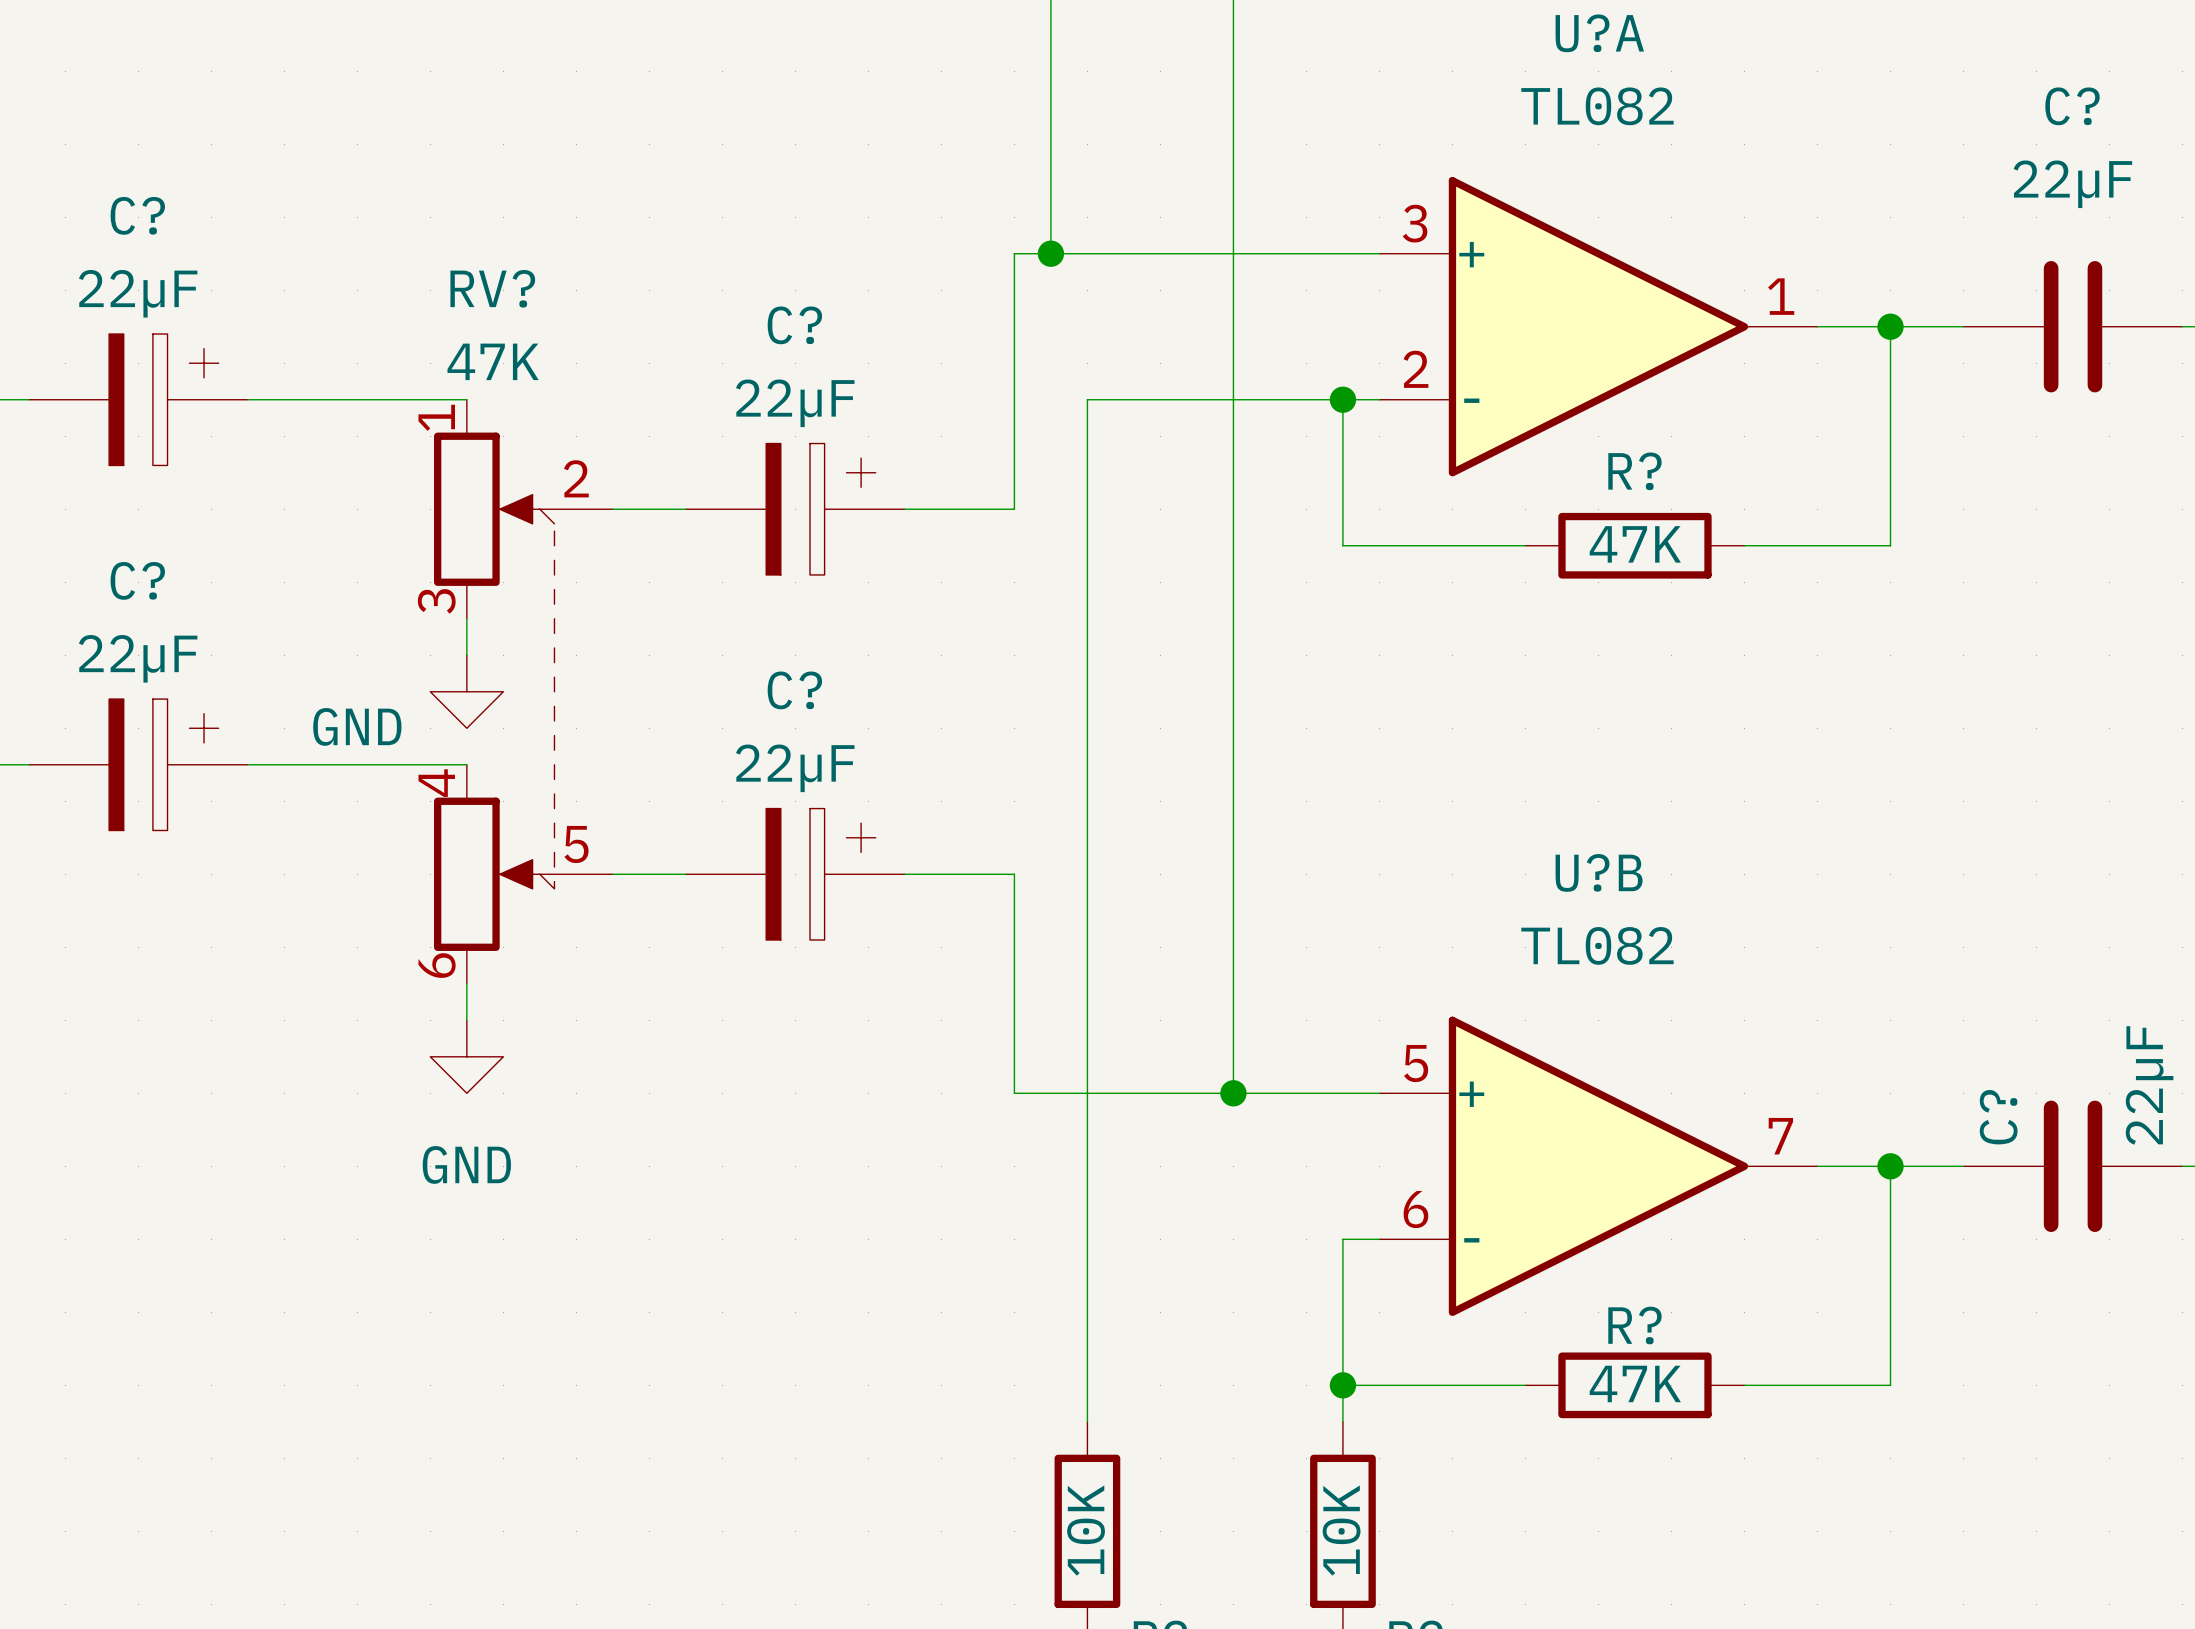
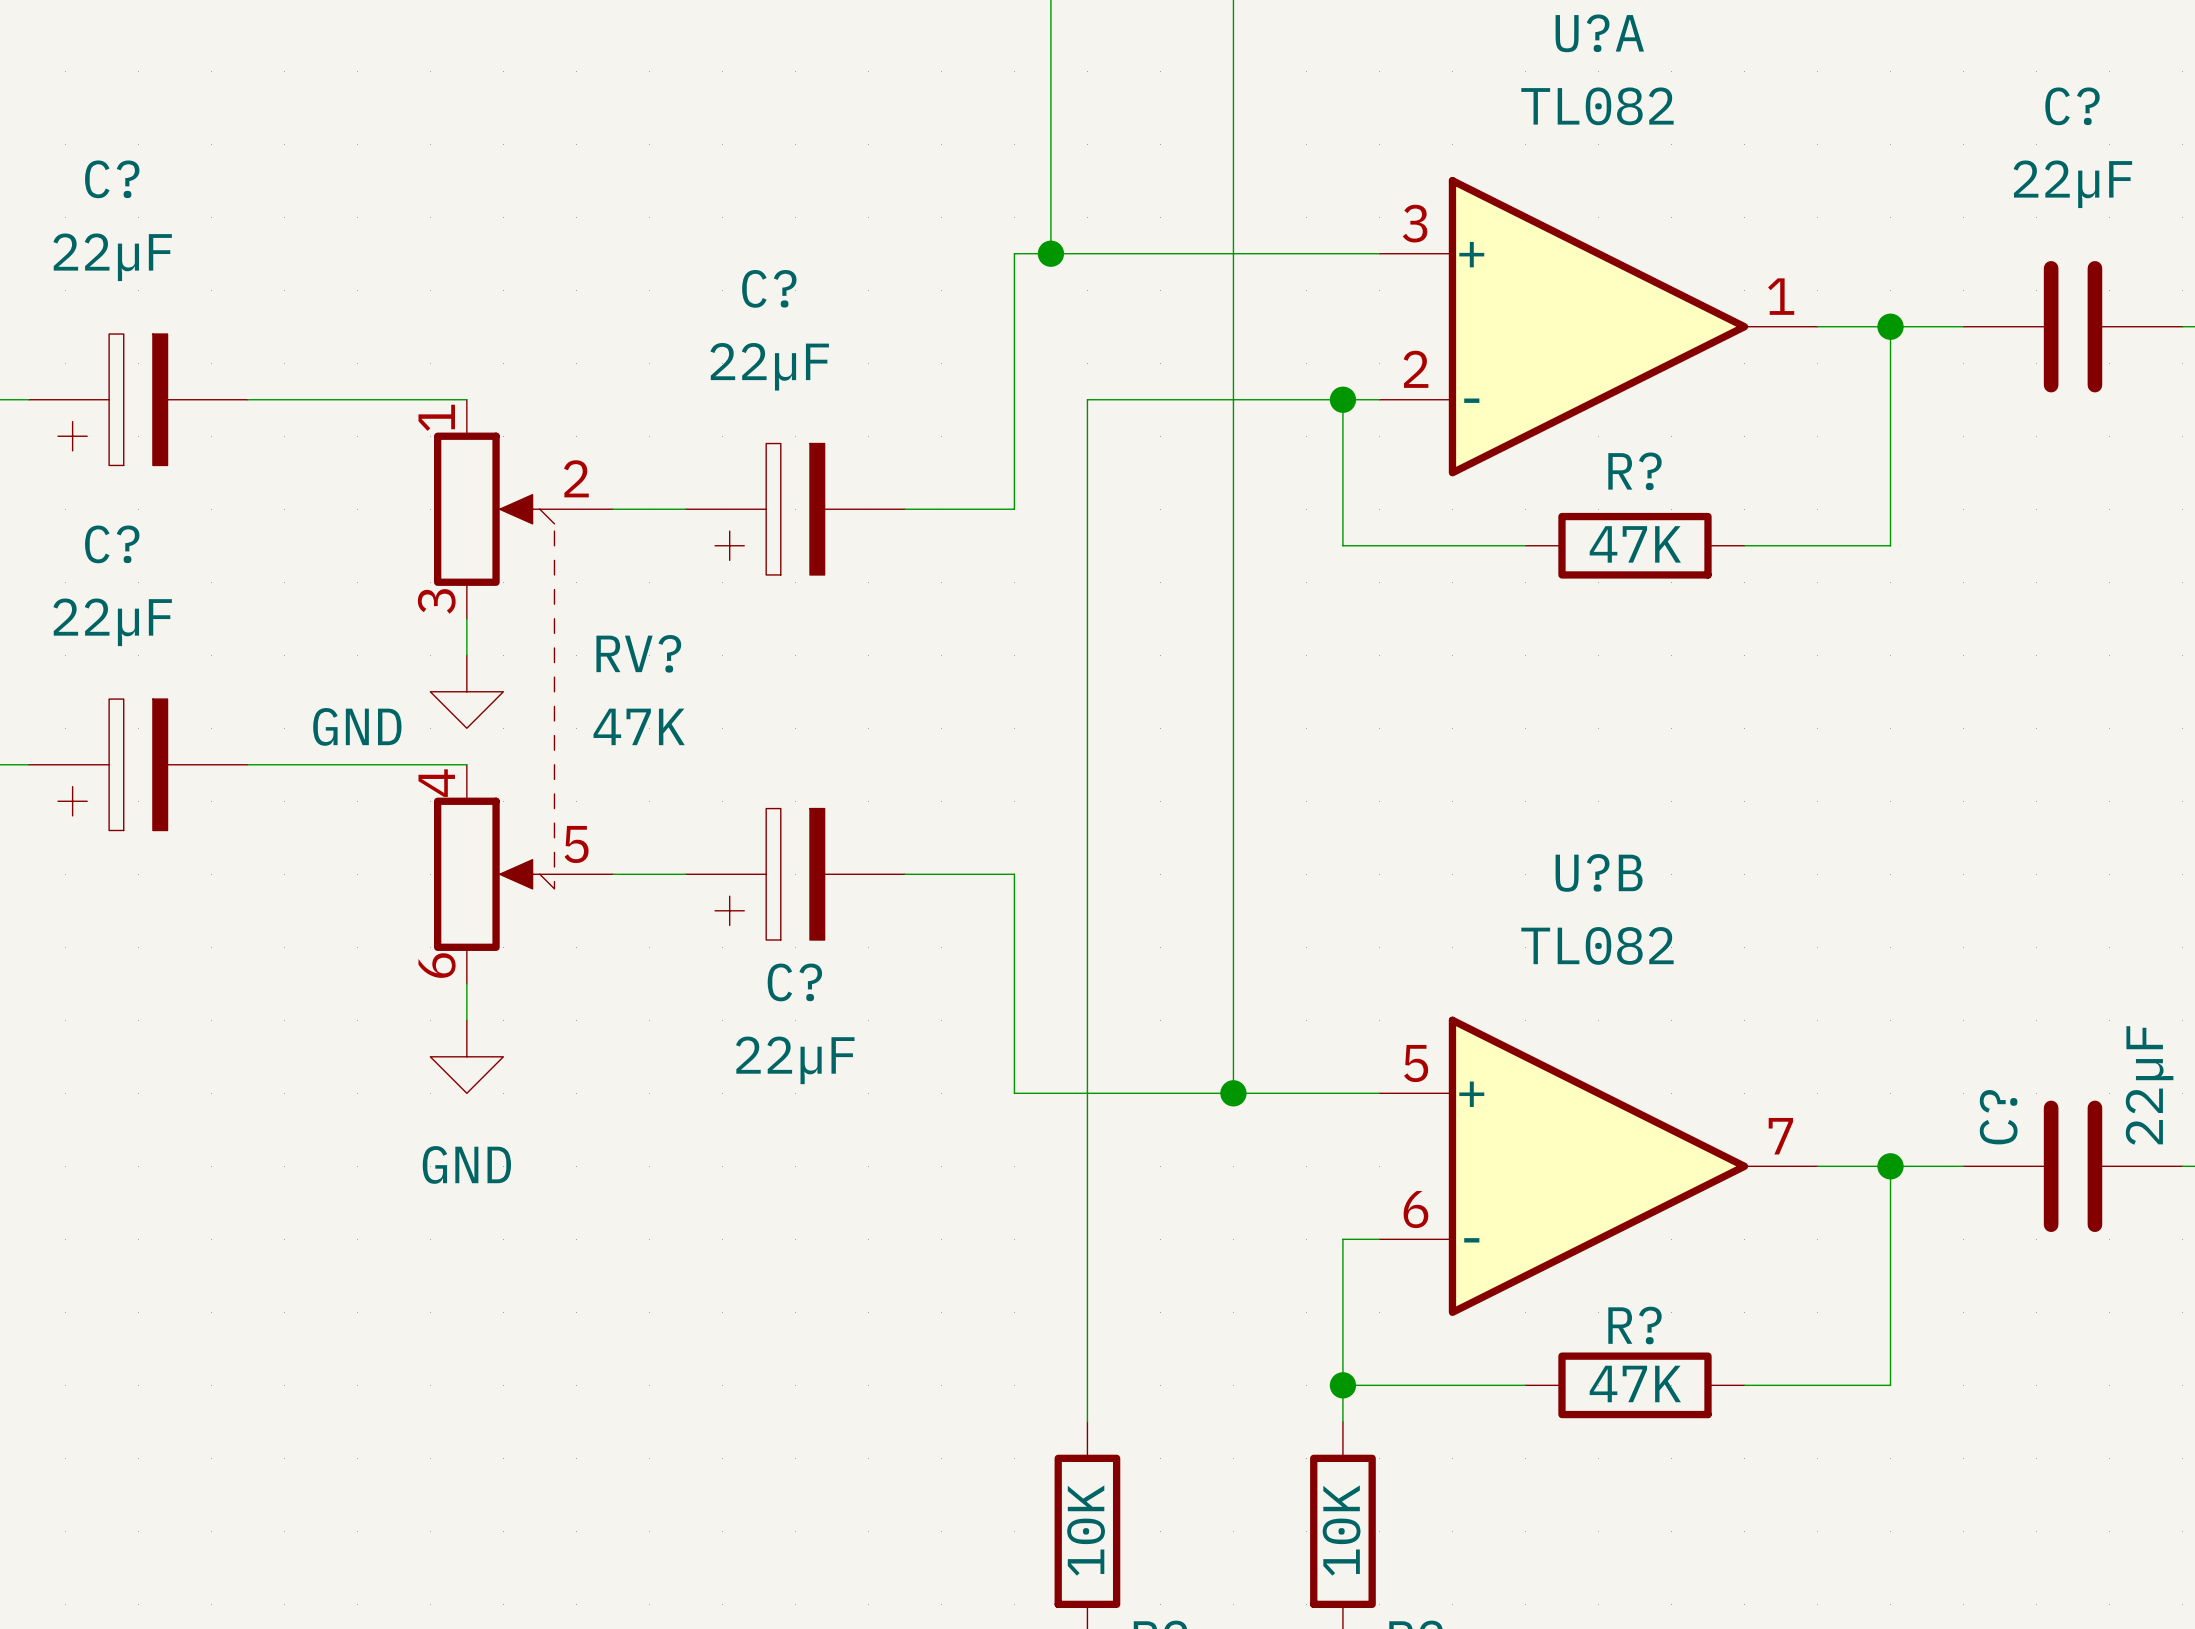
RV? name position: RV? (492, 288) -> RV? (638, 653)
RV? value position: 47K (493, 361) -> 47K (639, 726)
C? rotation: 0° (163, 399) -> 180° (112, 399)
C? rotation: 0° (820, 509) -> 180° (769, 509)
C? name position: C? (794, 690) -> C? (794, 982)
C? rotation: 0° (163, 764) -> 180° (112, 764)
C? value position: 22µF (795, 768) -> 22µF (795, 1060)
C? rotation: 0° (820, 874) -> 180° (769, 874)

